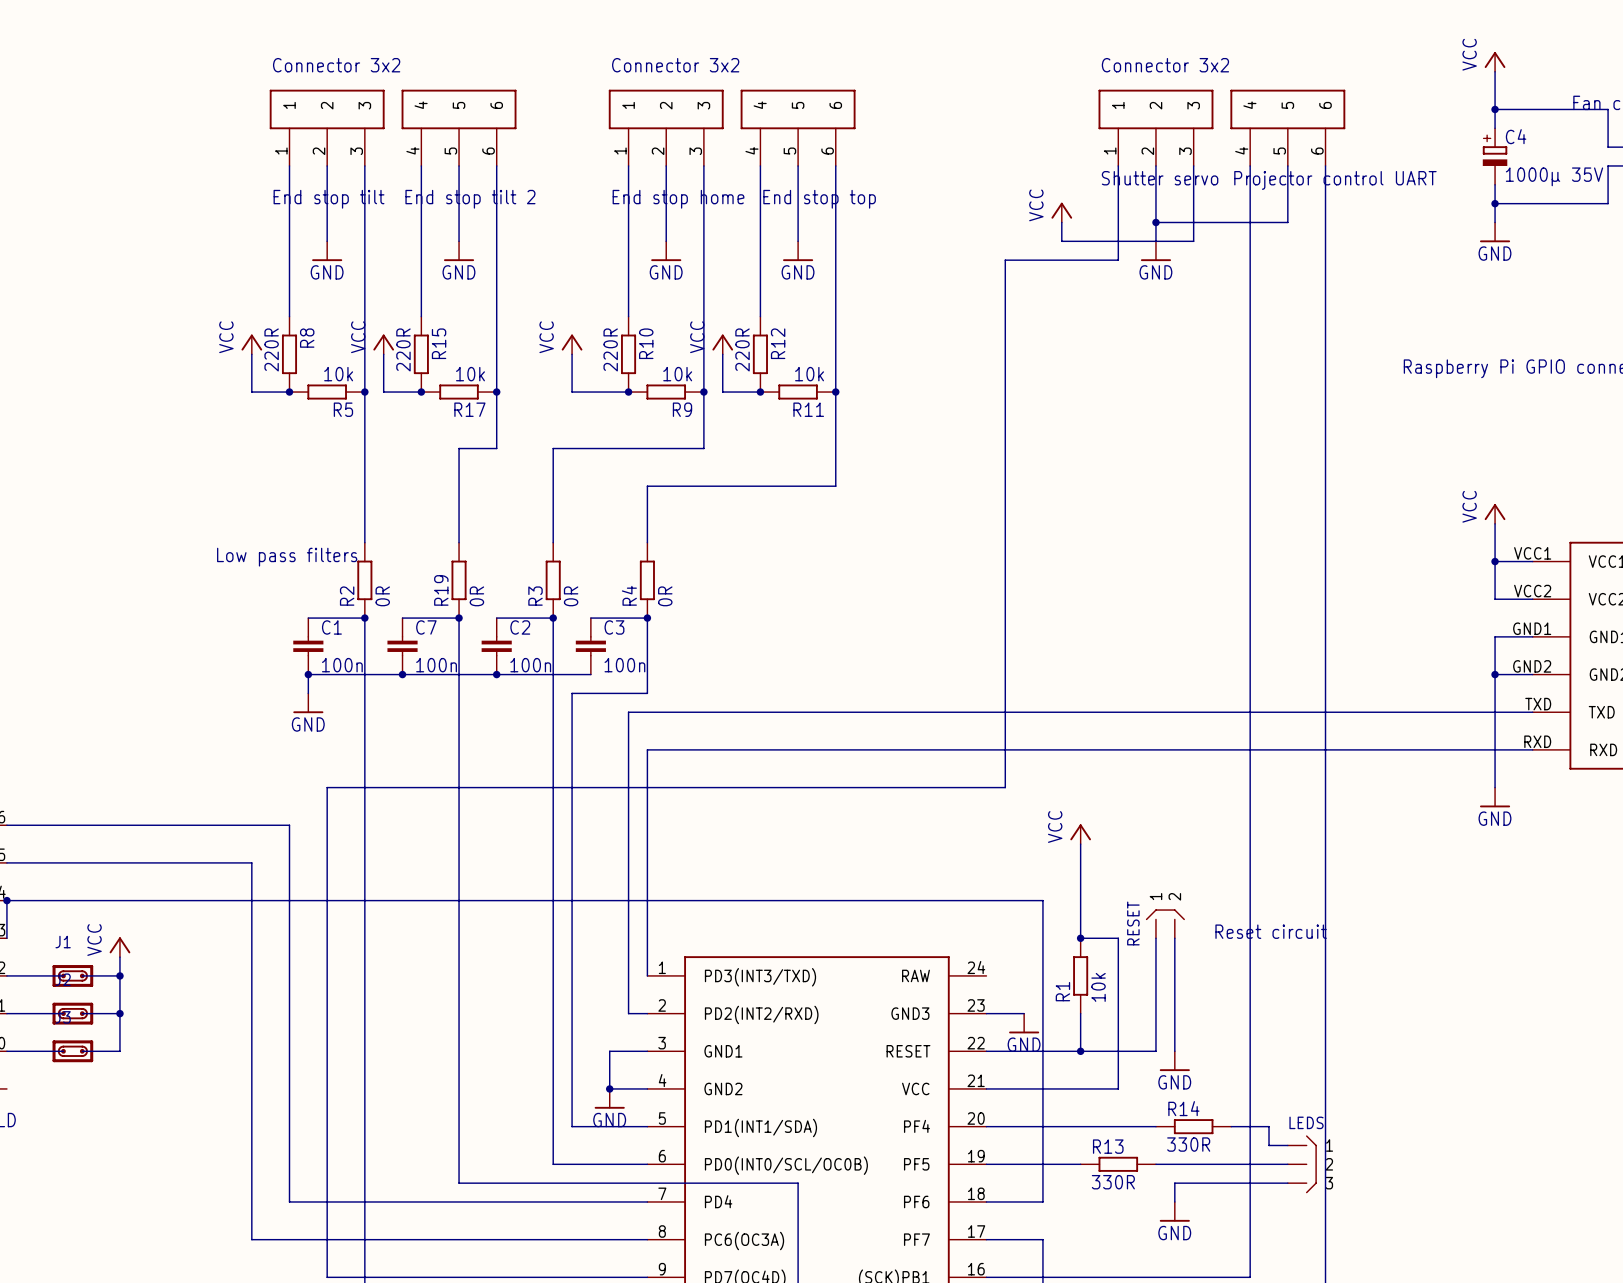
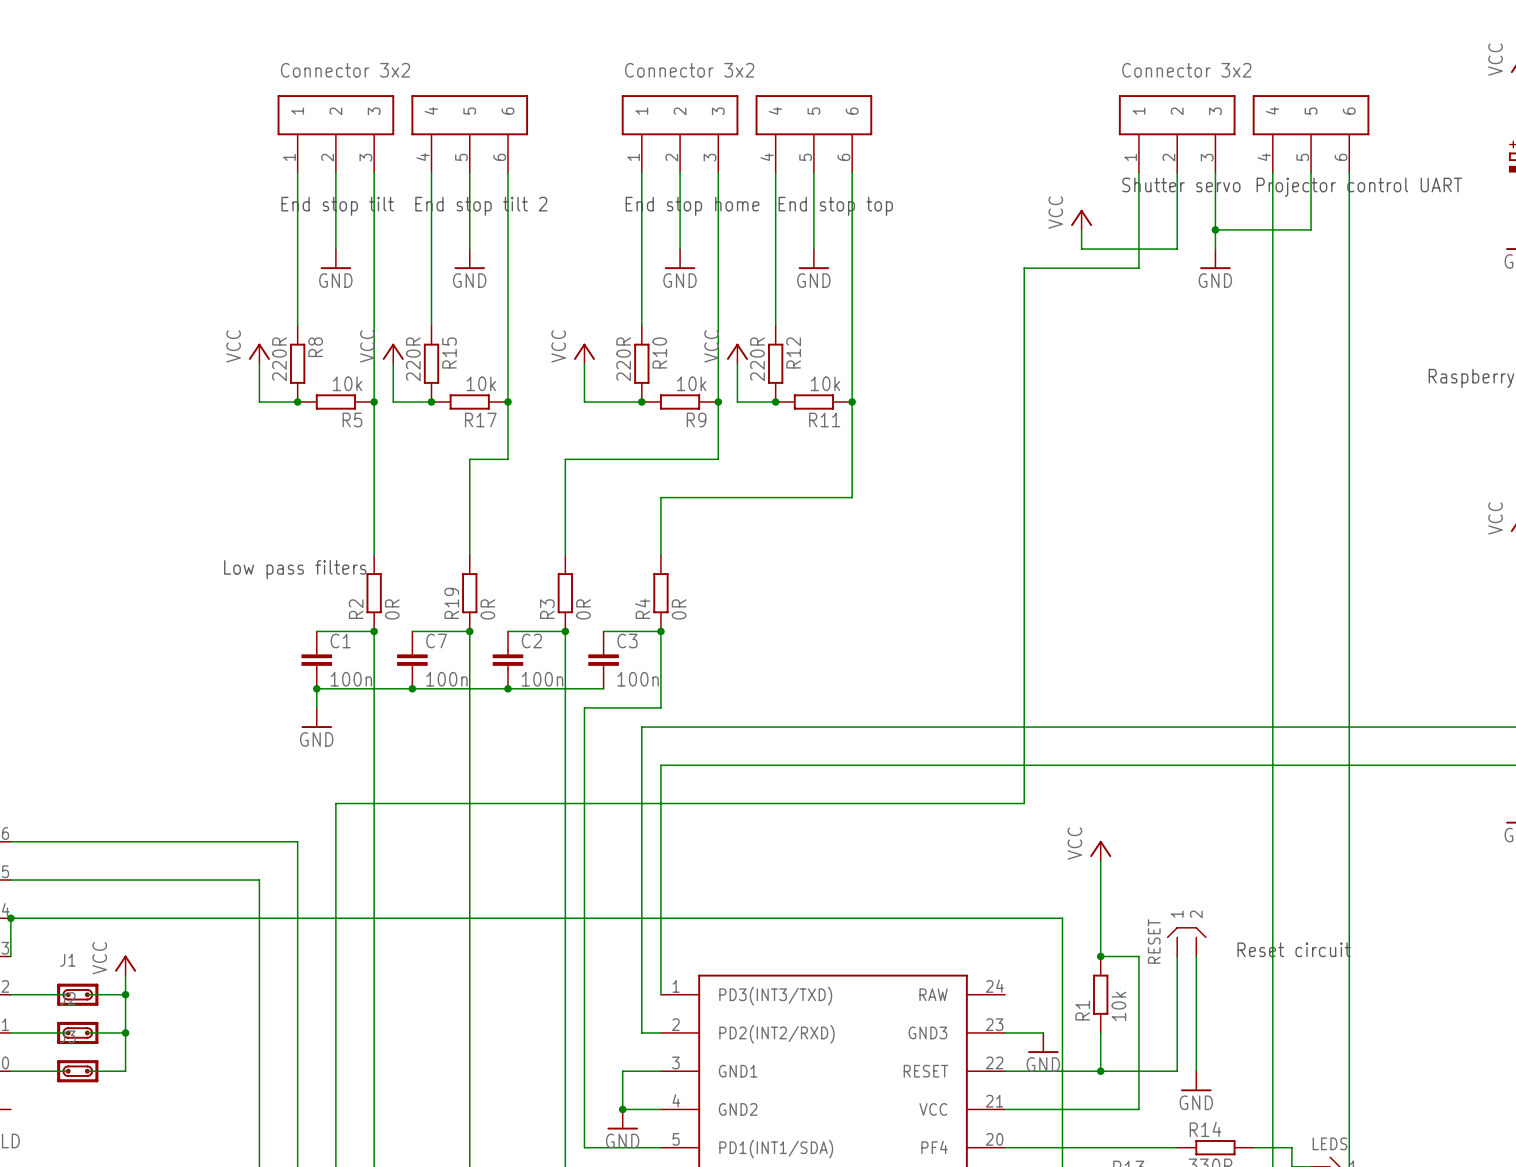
wire: (1155, 222) (1193, 222) -> none
junction position: (1155, 222) -> (1215, 229)
wire: (1155, 241) (1193, 241) -> none
power symbol position: GND (1155, 251) -> GND (1215, 259)

